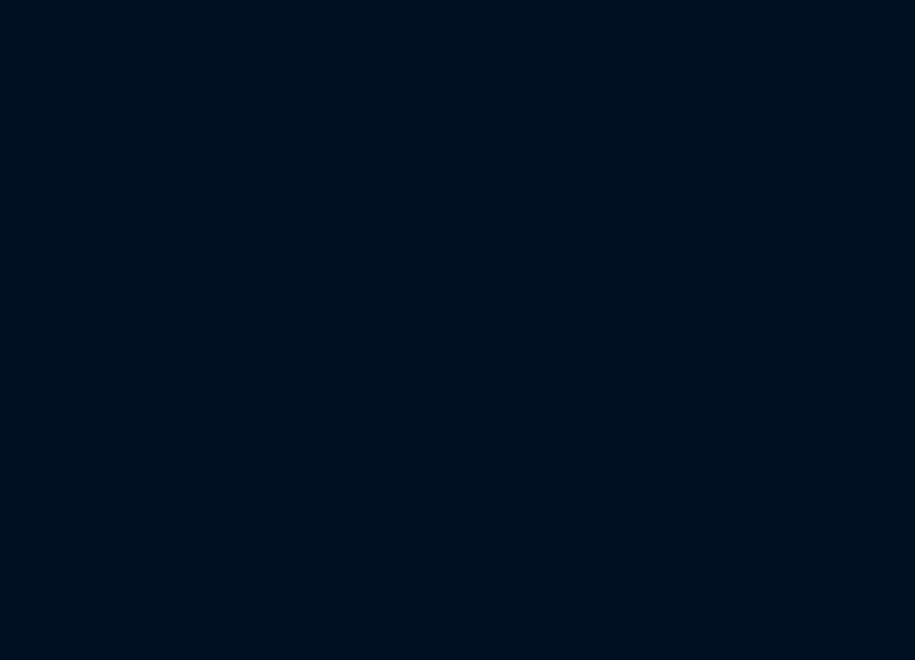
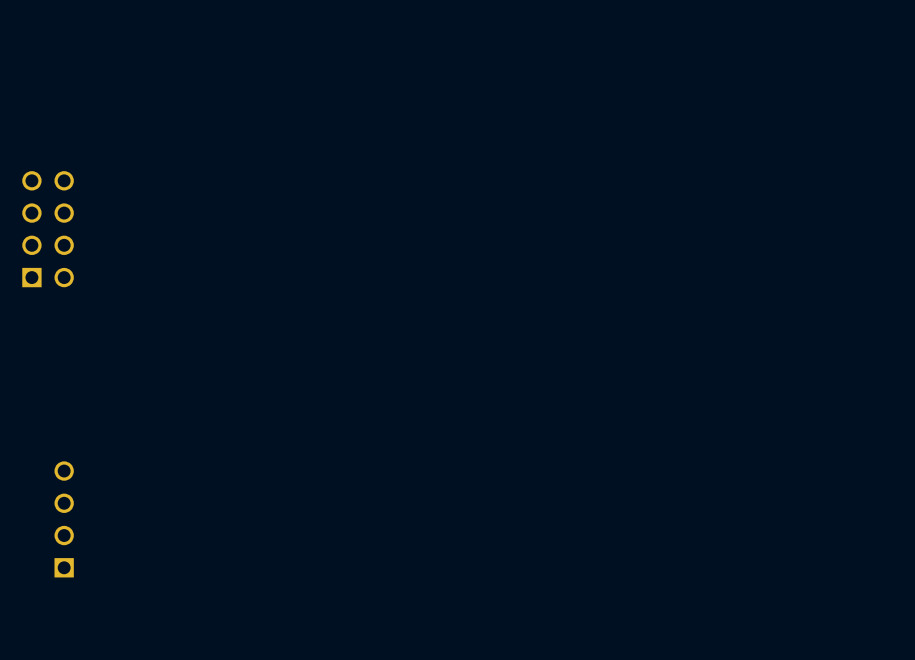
part: none -> (48, 229)
part: none -> (64, 519)

